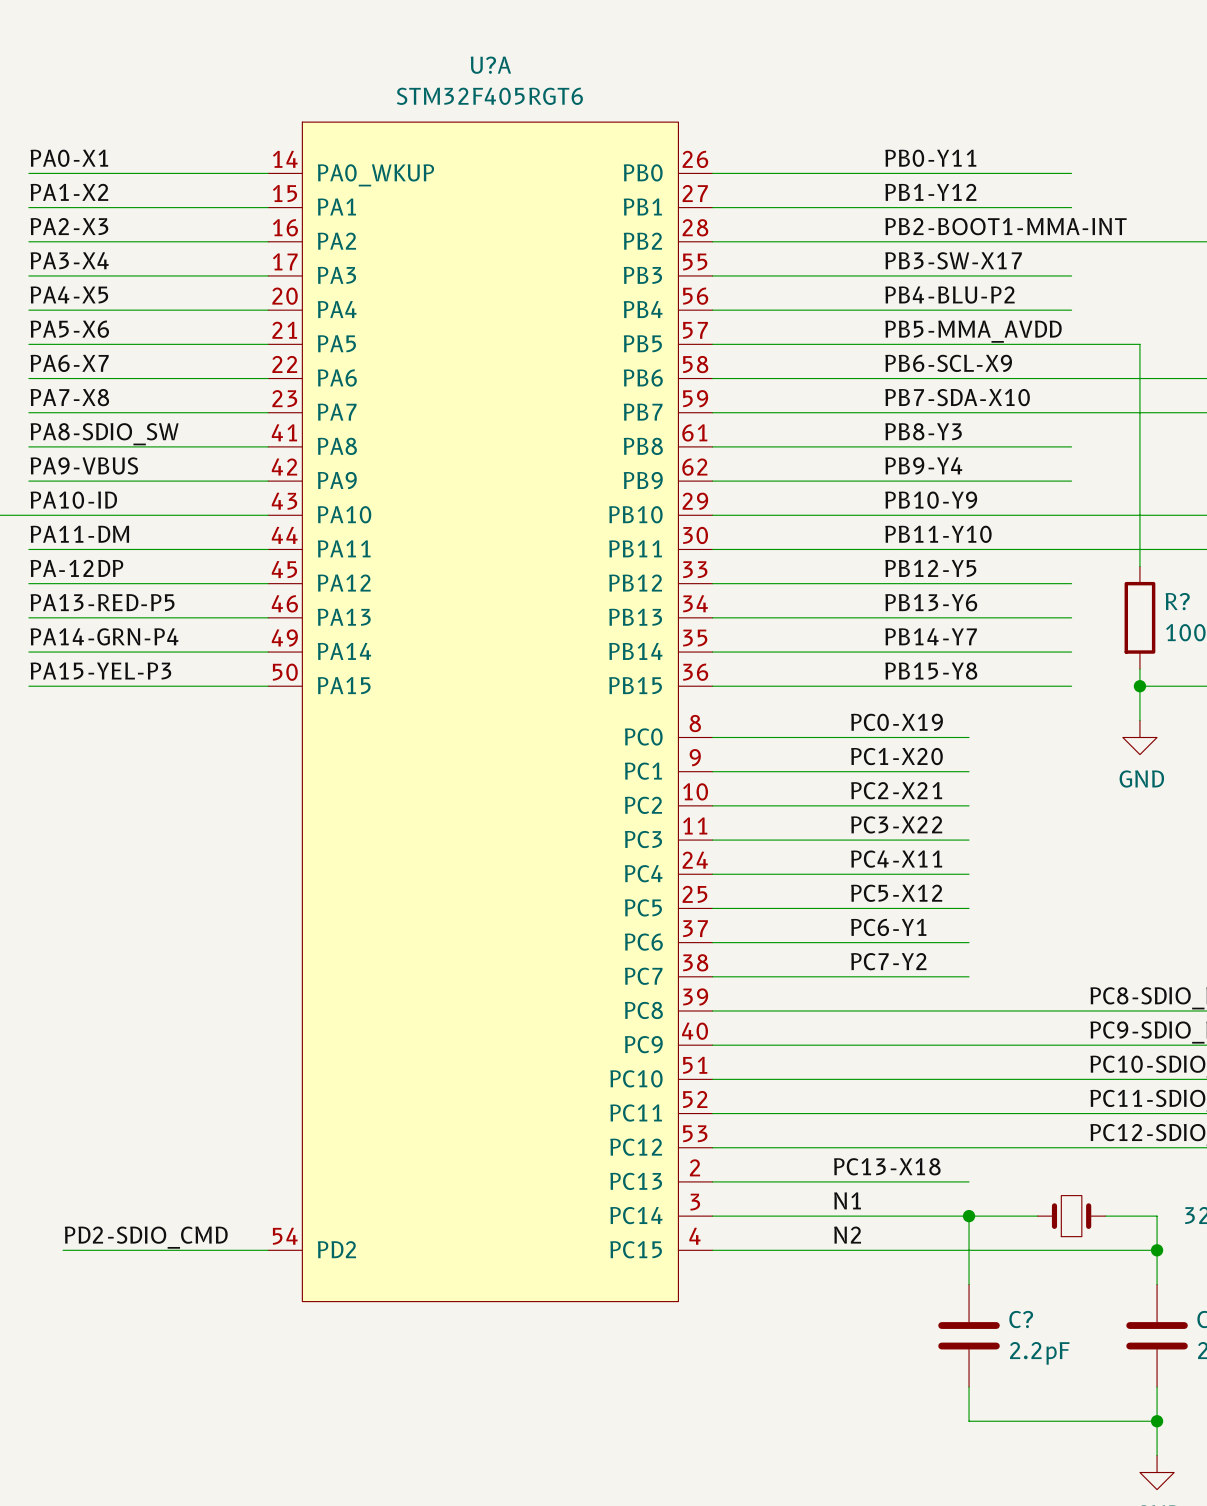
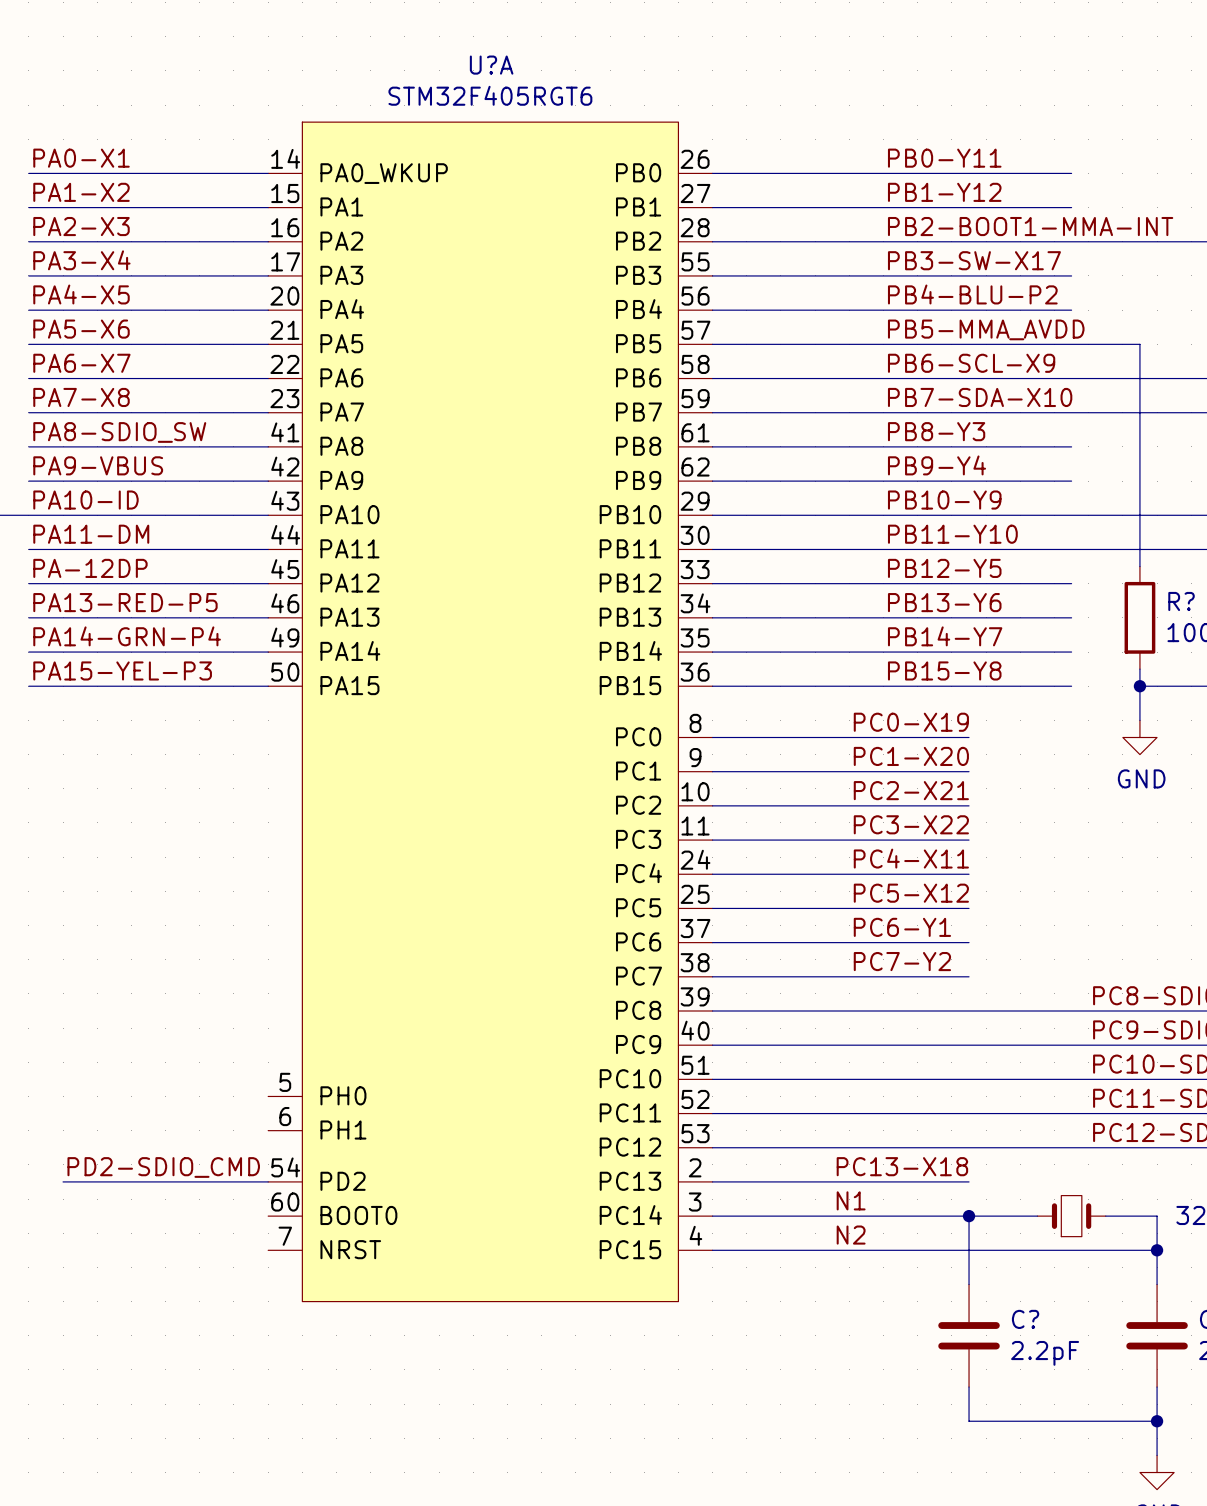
U?A symbol: [268, 122, 713, 1302] -> [268, 122, 713, 1302]
label position: PD2-SDIO_CMD (146, 1237) -> PD2-SDIO_CMD (163, 1167)
wire: (63, 1250) (268, 1250) -> (63, 1181) (268, 1181)

